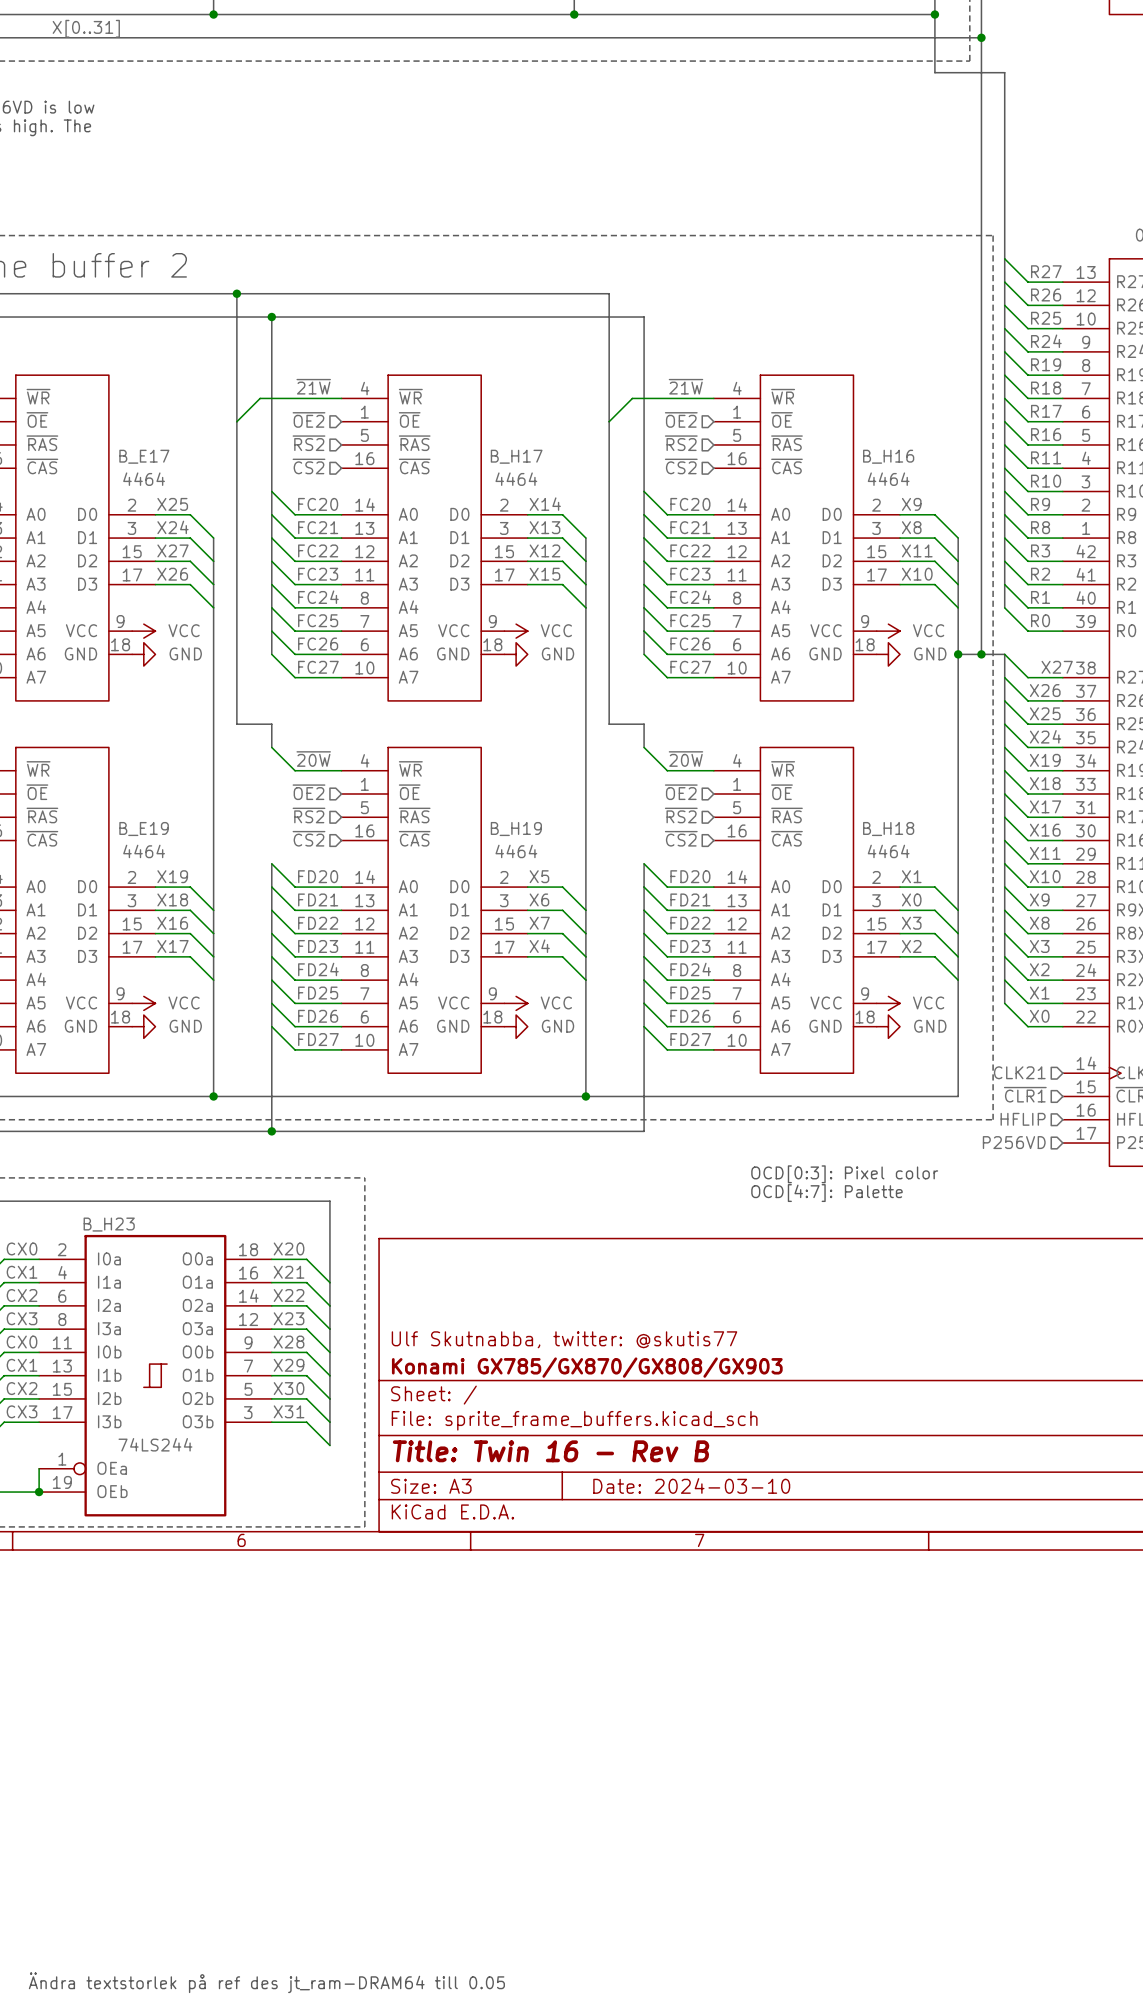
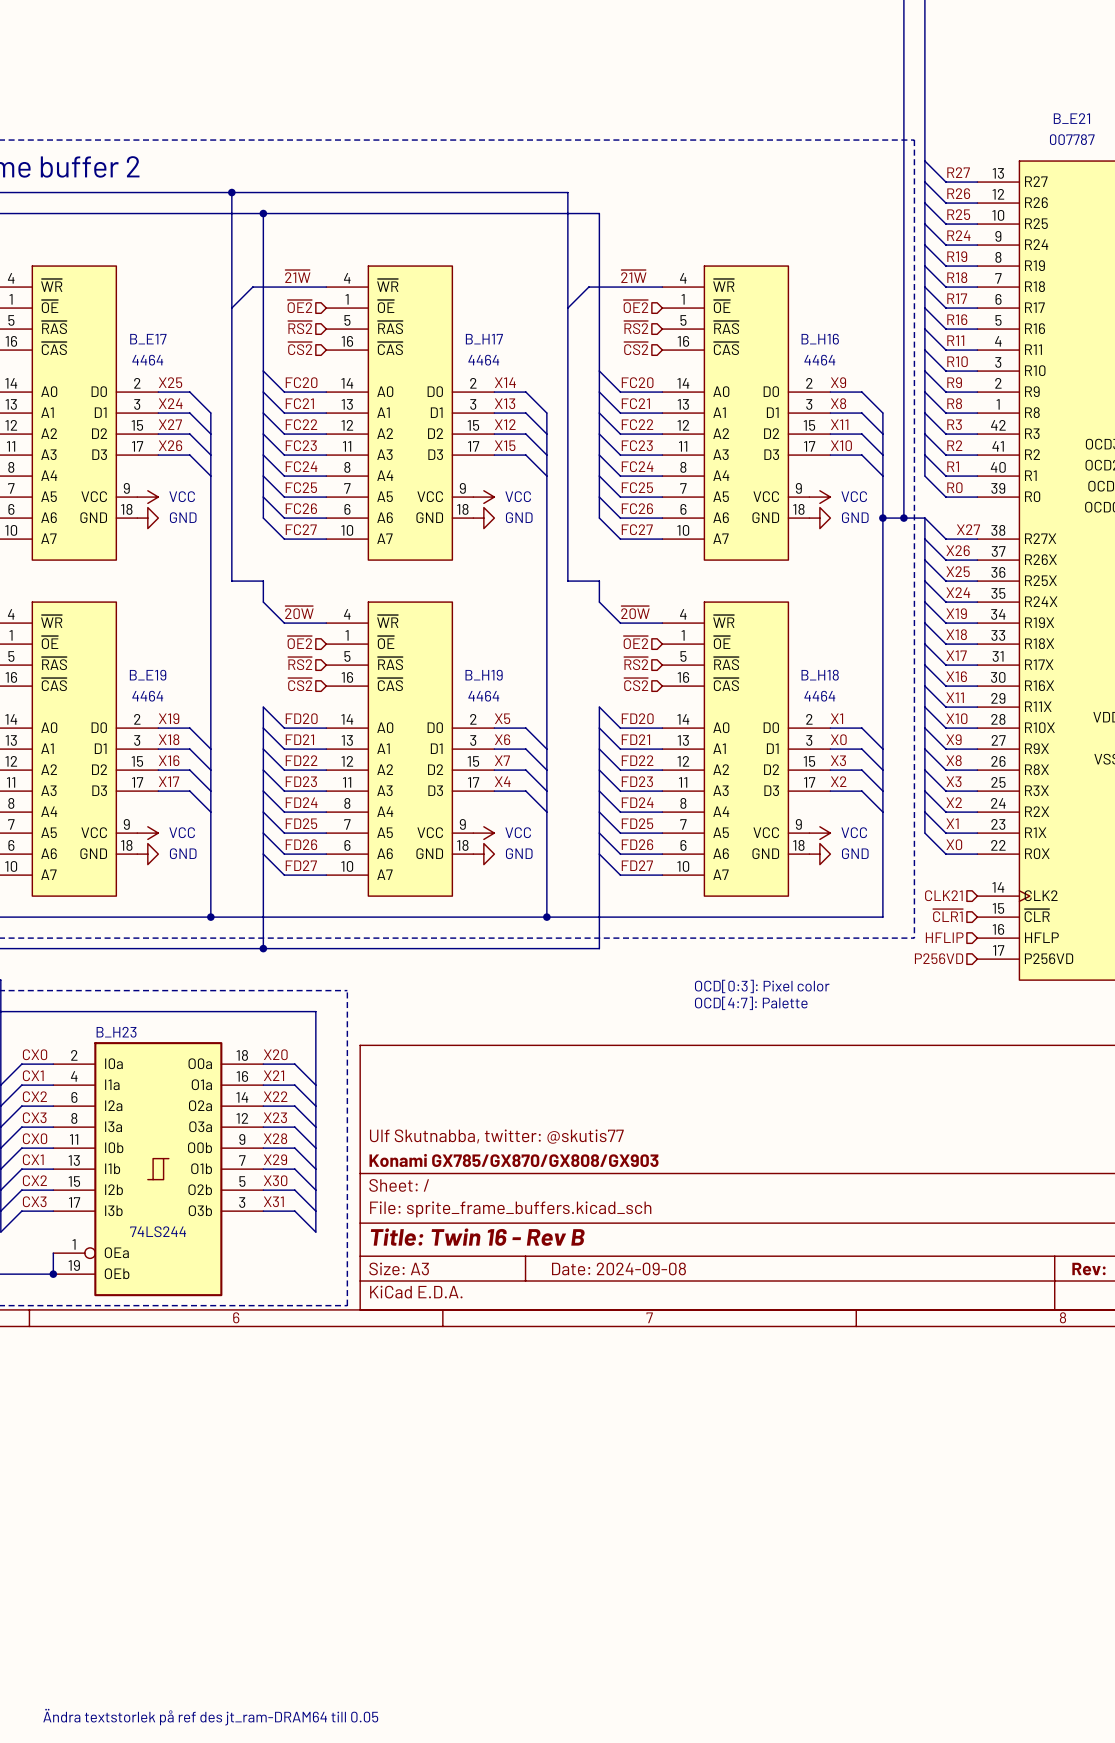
title block: Date: 2024-03-10 (691, 1485) -> Date: 2024-09-08 (618, 1268)

